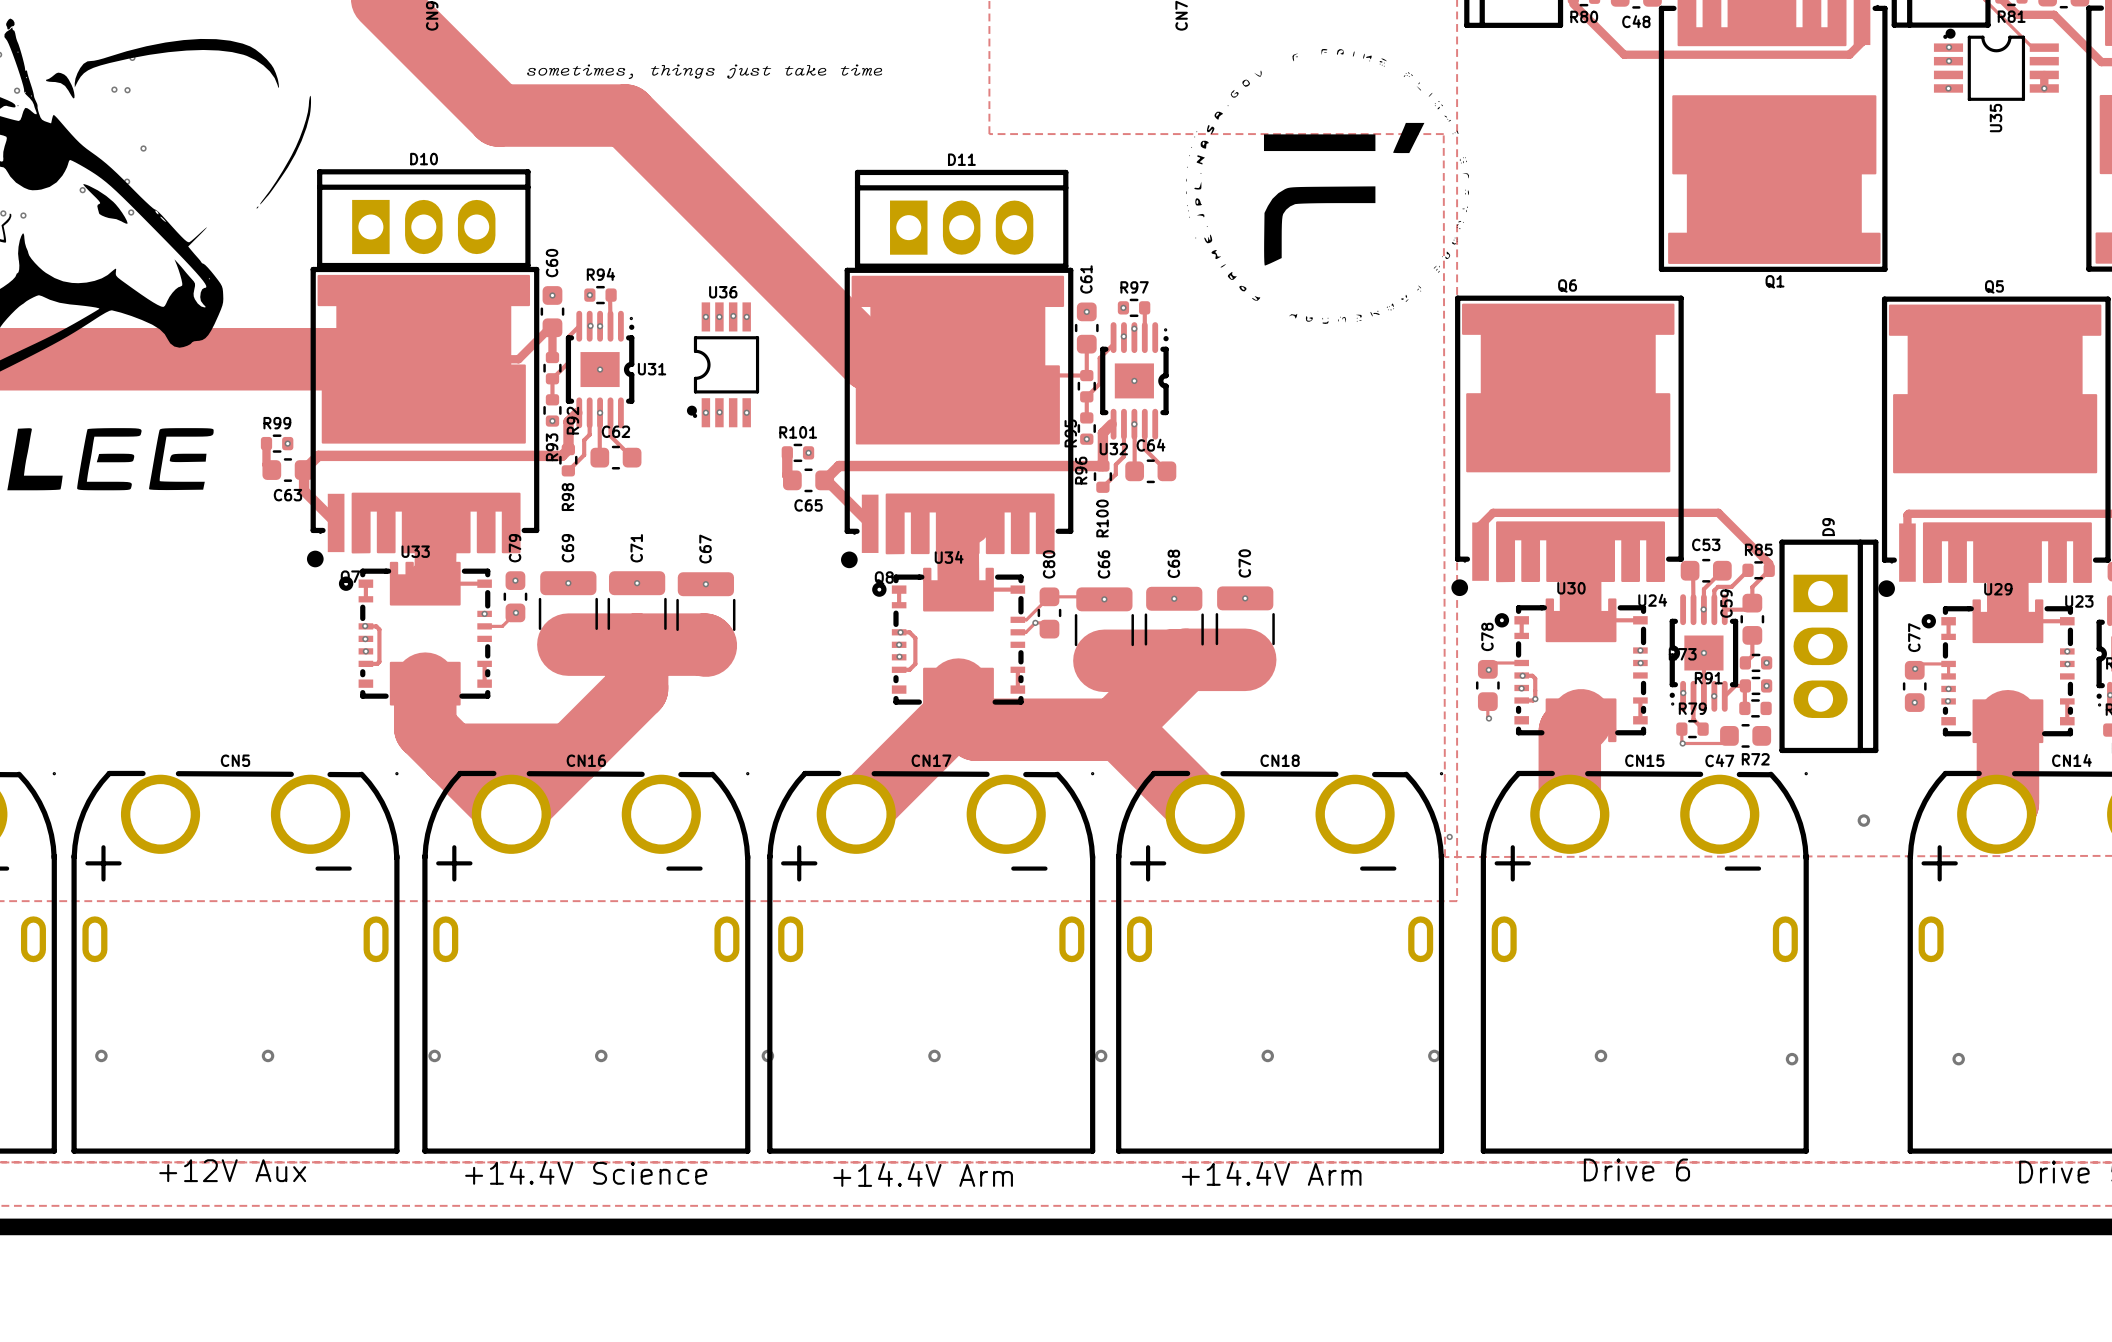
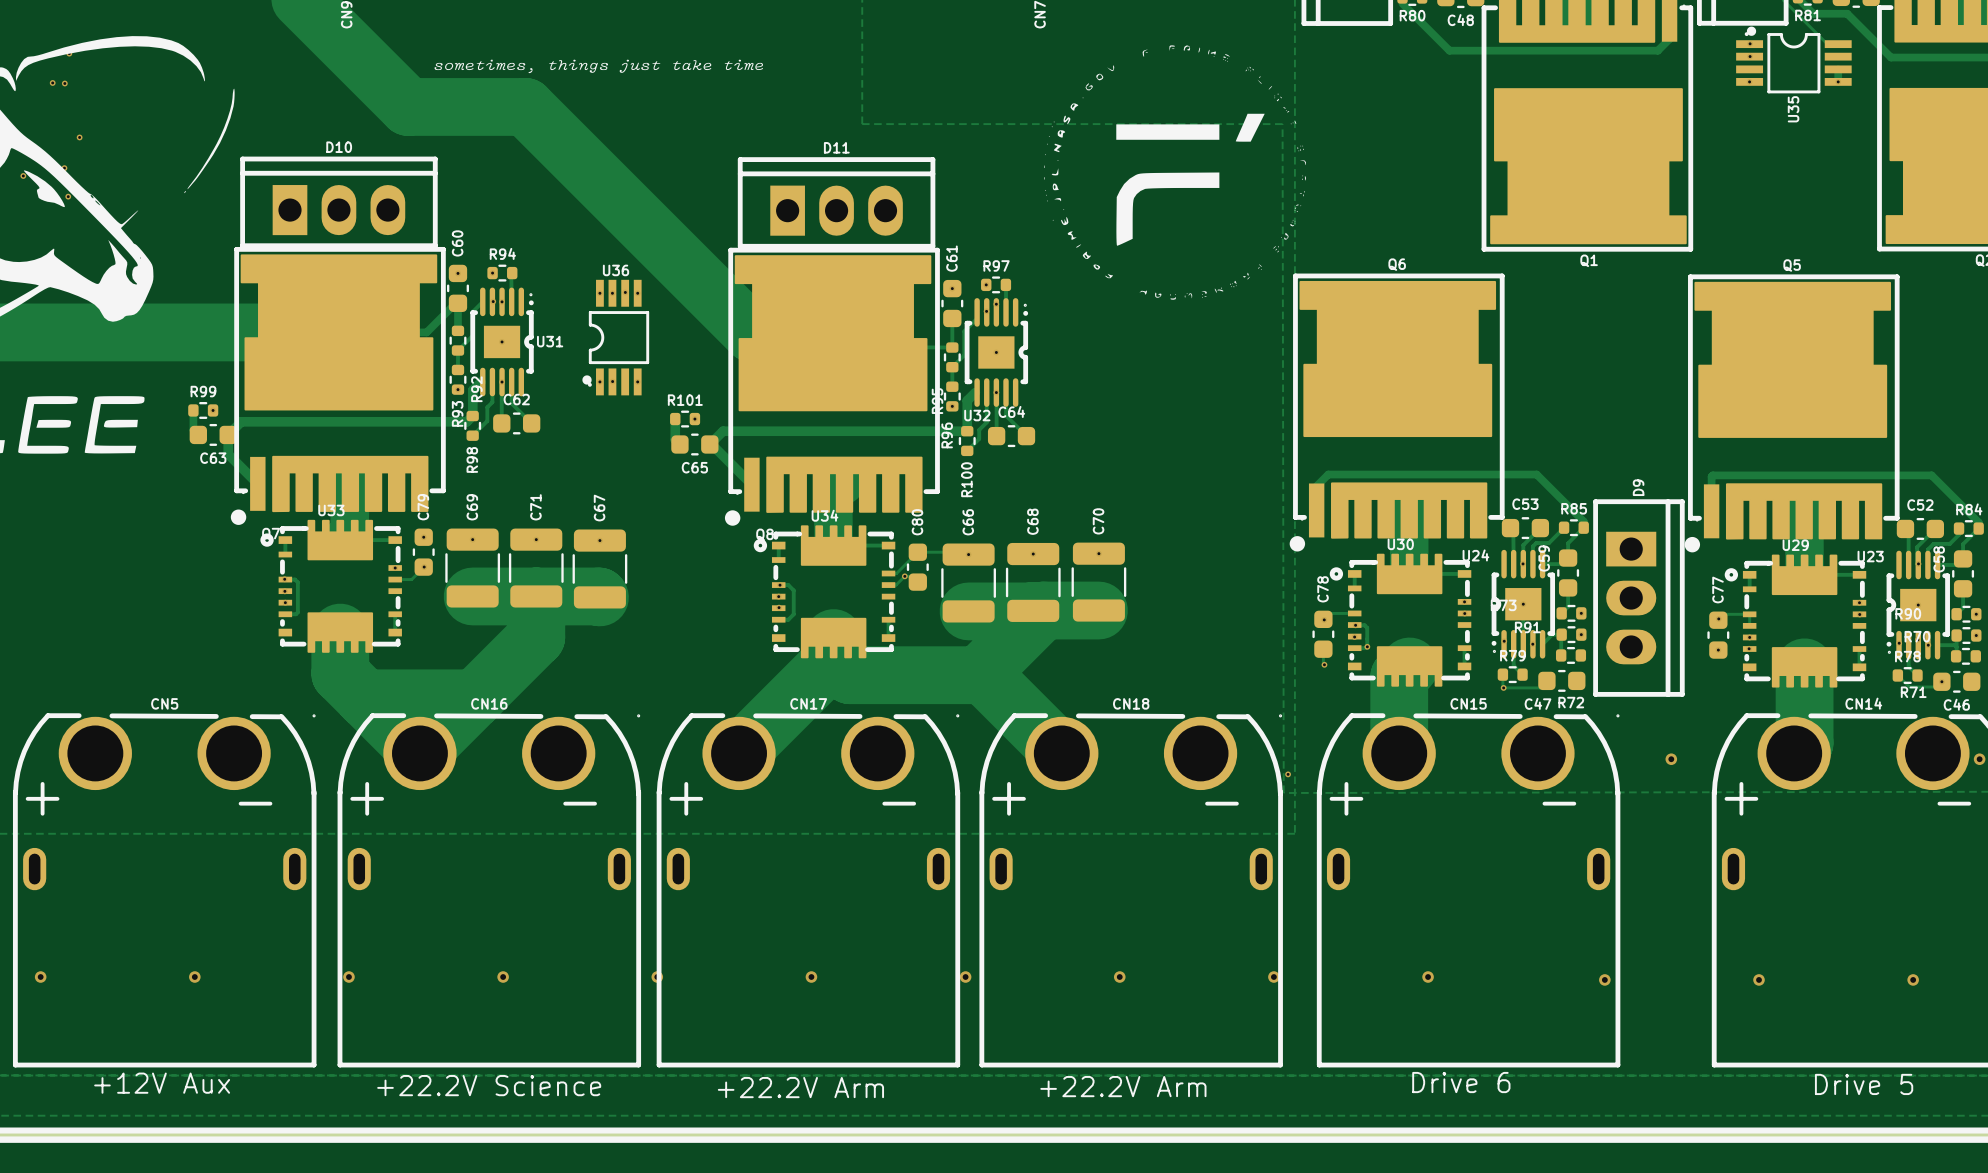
text: +14.4V Science (586, 1172) -> +22.2V Science (489, 1085)
text: +14.4V Arm (1271, 1173) -> +22.2V Arm (1123, 1086)
text: +14.4V Arm (923, 1174) -> +22.2V Arm (800, 1087)

